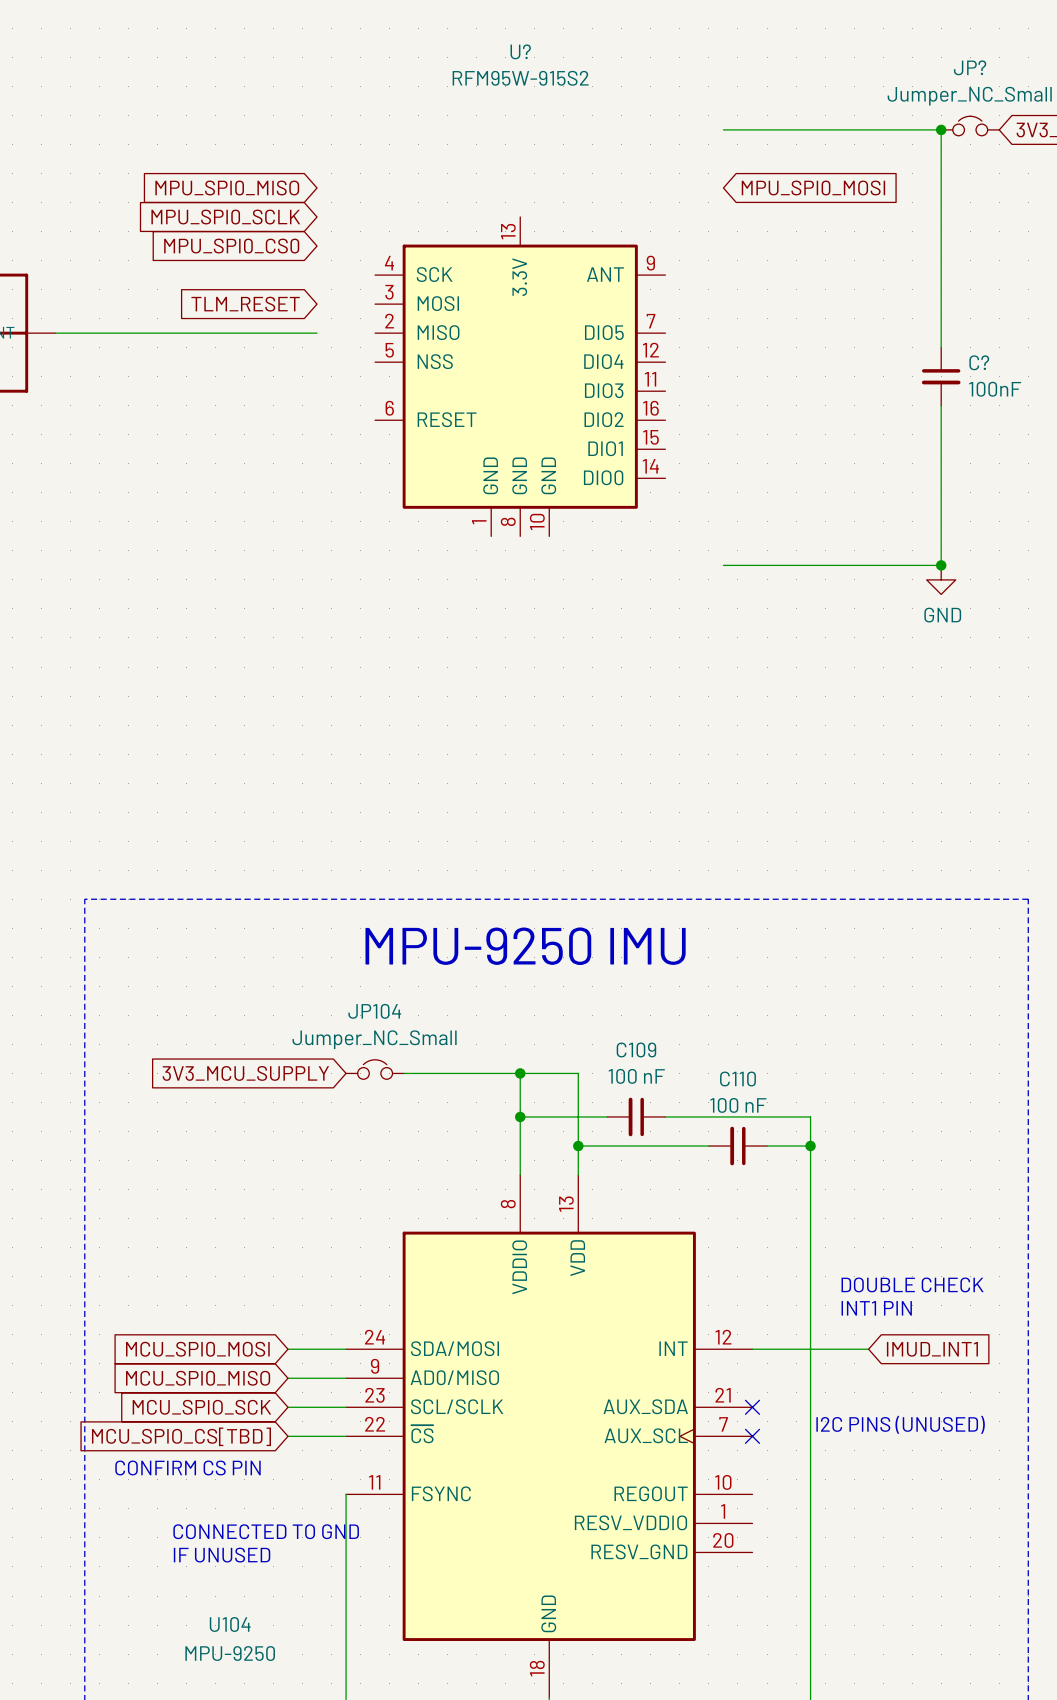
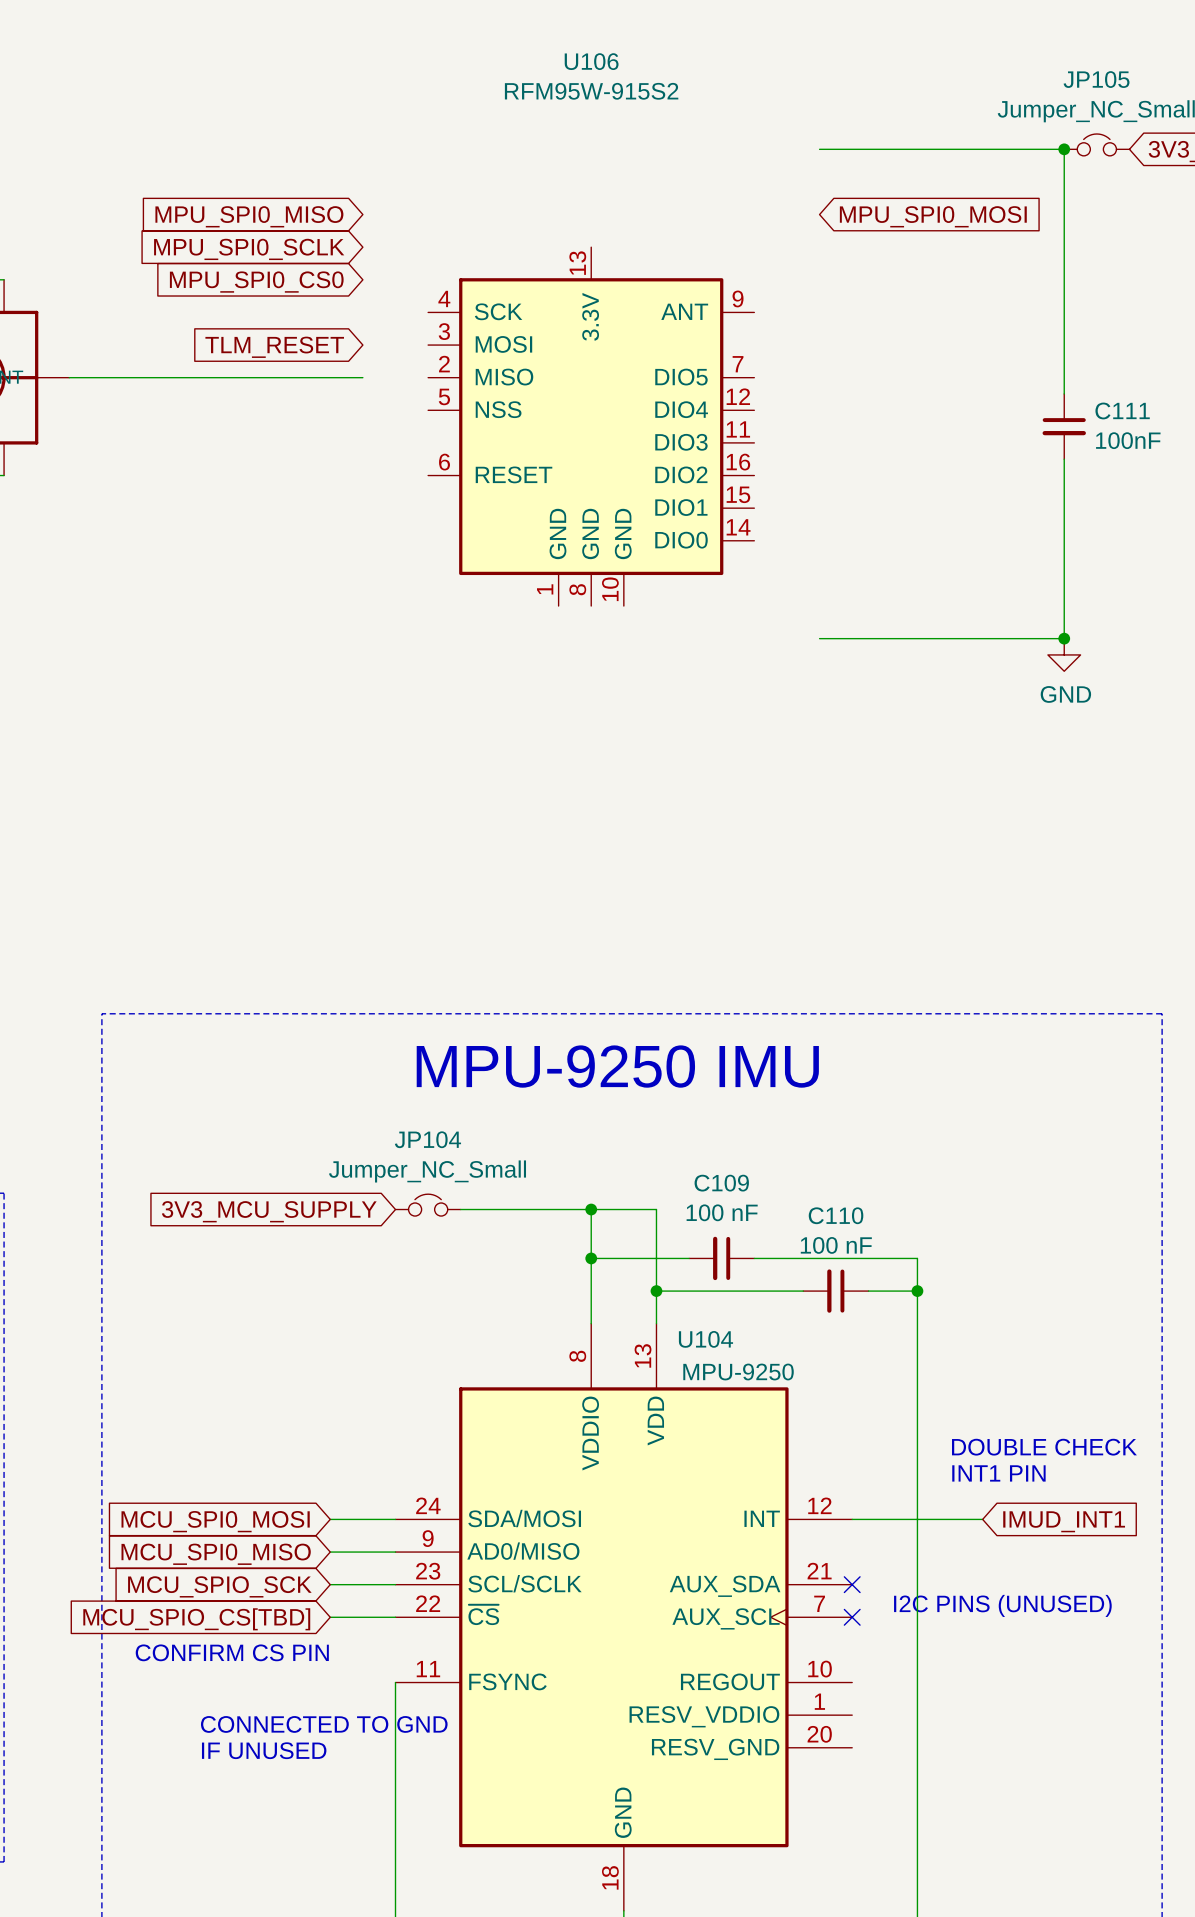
U? name: U? (520, 51) -> U106 (591, 61)
JP? name: JP? (970, 67) -> JP105 (1096, 79)
C? name: C? (979, 362) -> C111 (1122, 410)
U104 name position: U104 (230, 1624) -> U104 (705, 1339)
U104 value position: MPU-9250 (230, 1653) -> MPU-9250 (738, 1372)

